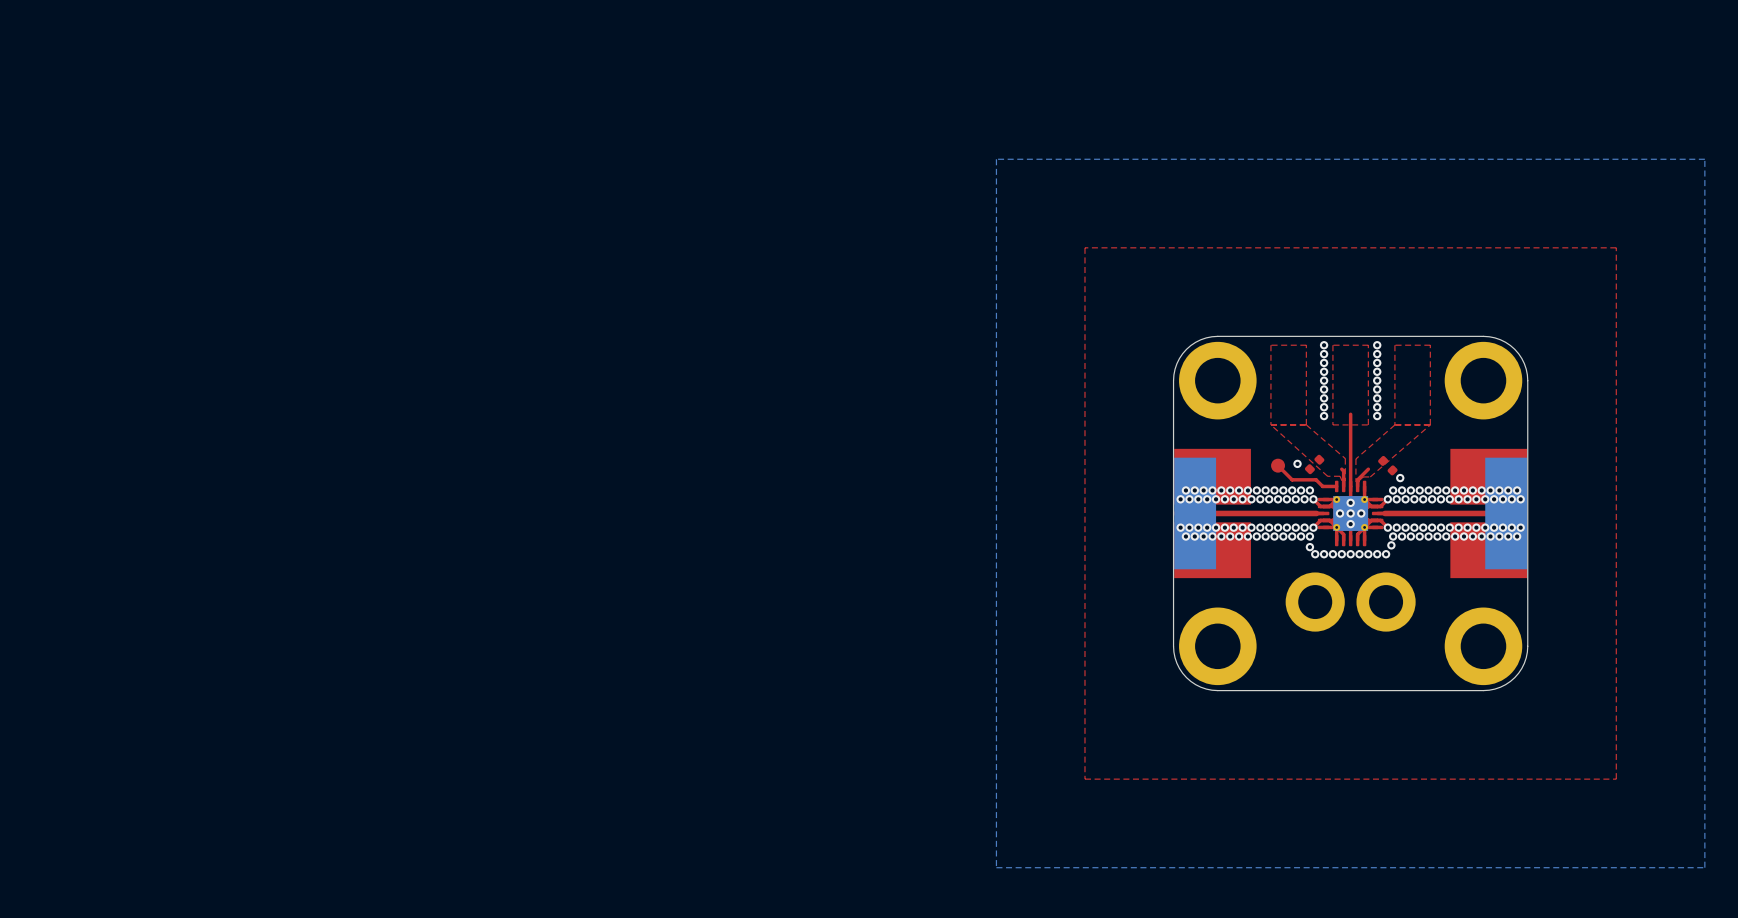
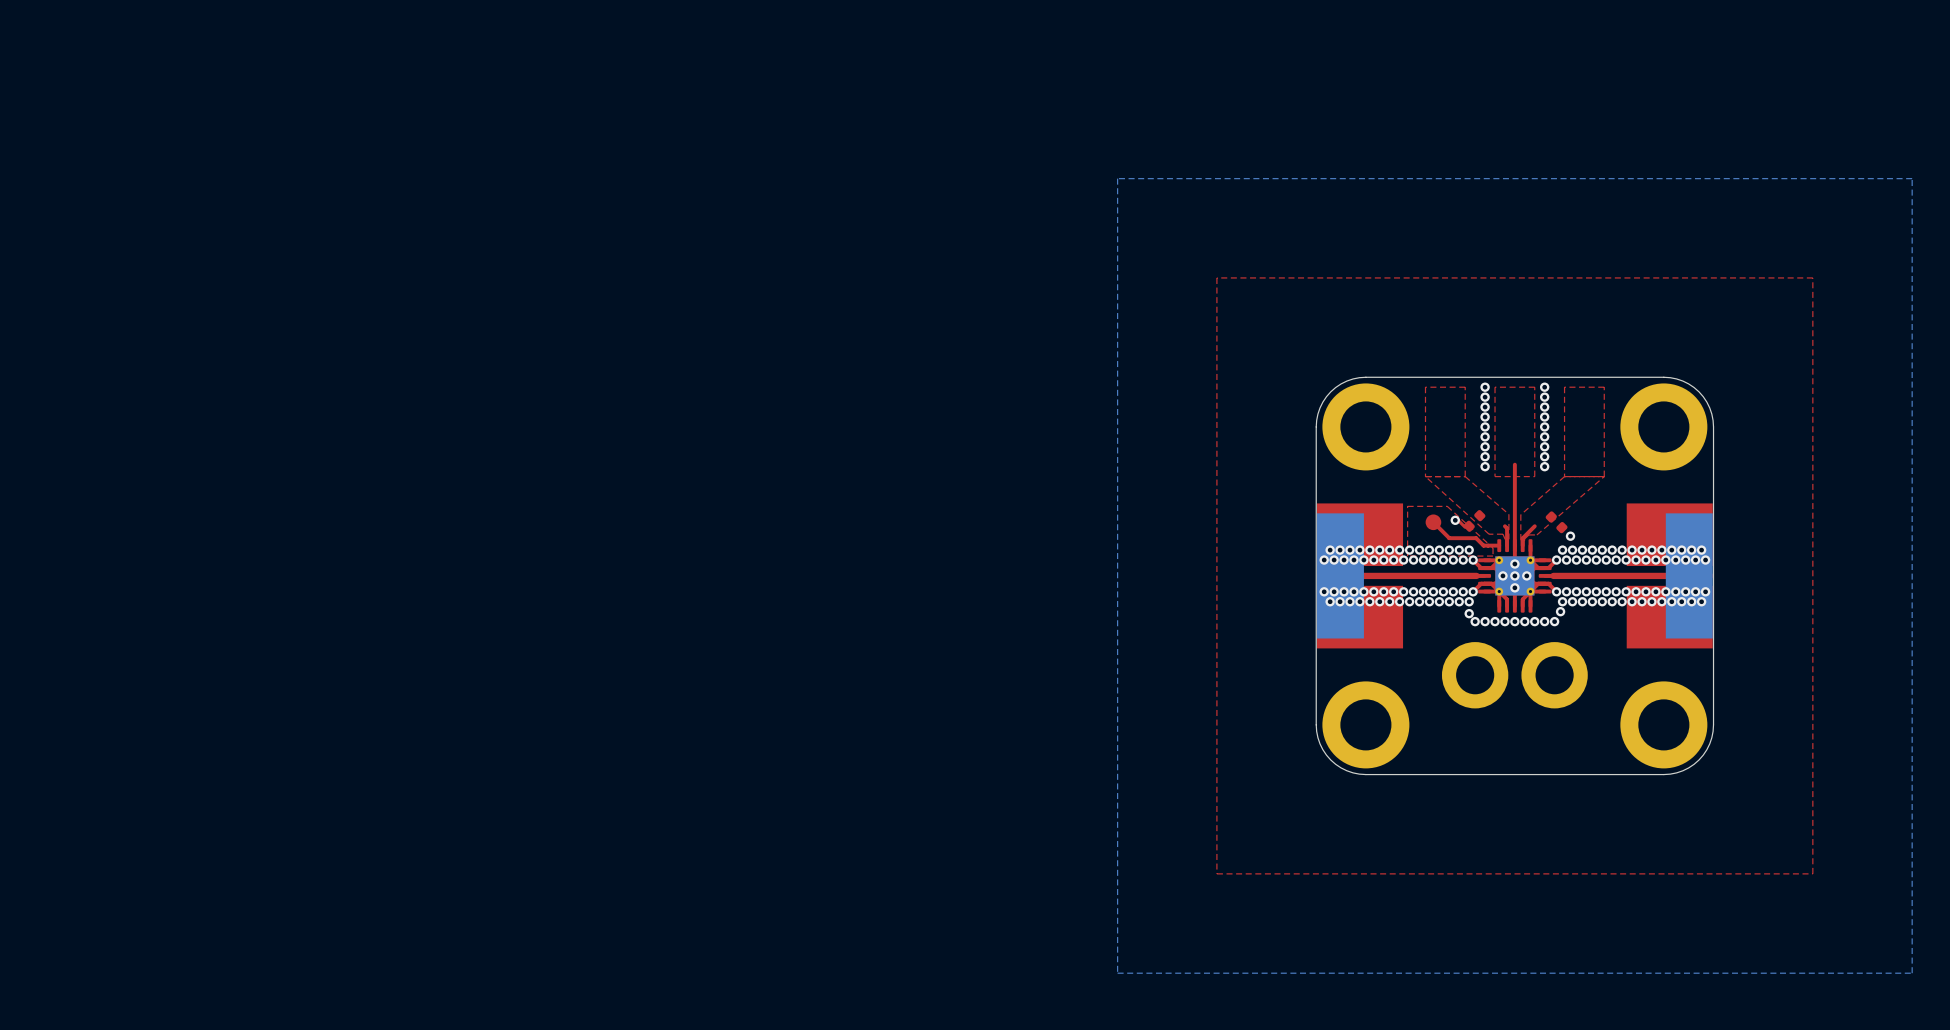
top zone outline: none -> (1447, 506) (1493, 548) (1493, 556) (1407, 556) (1407, 506) (1447, 506)
top track: none -> (1454, 519) (1457, 519) (1465, 527)

